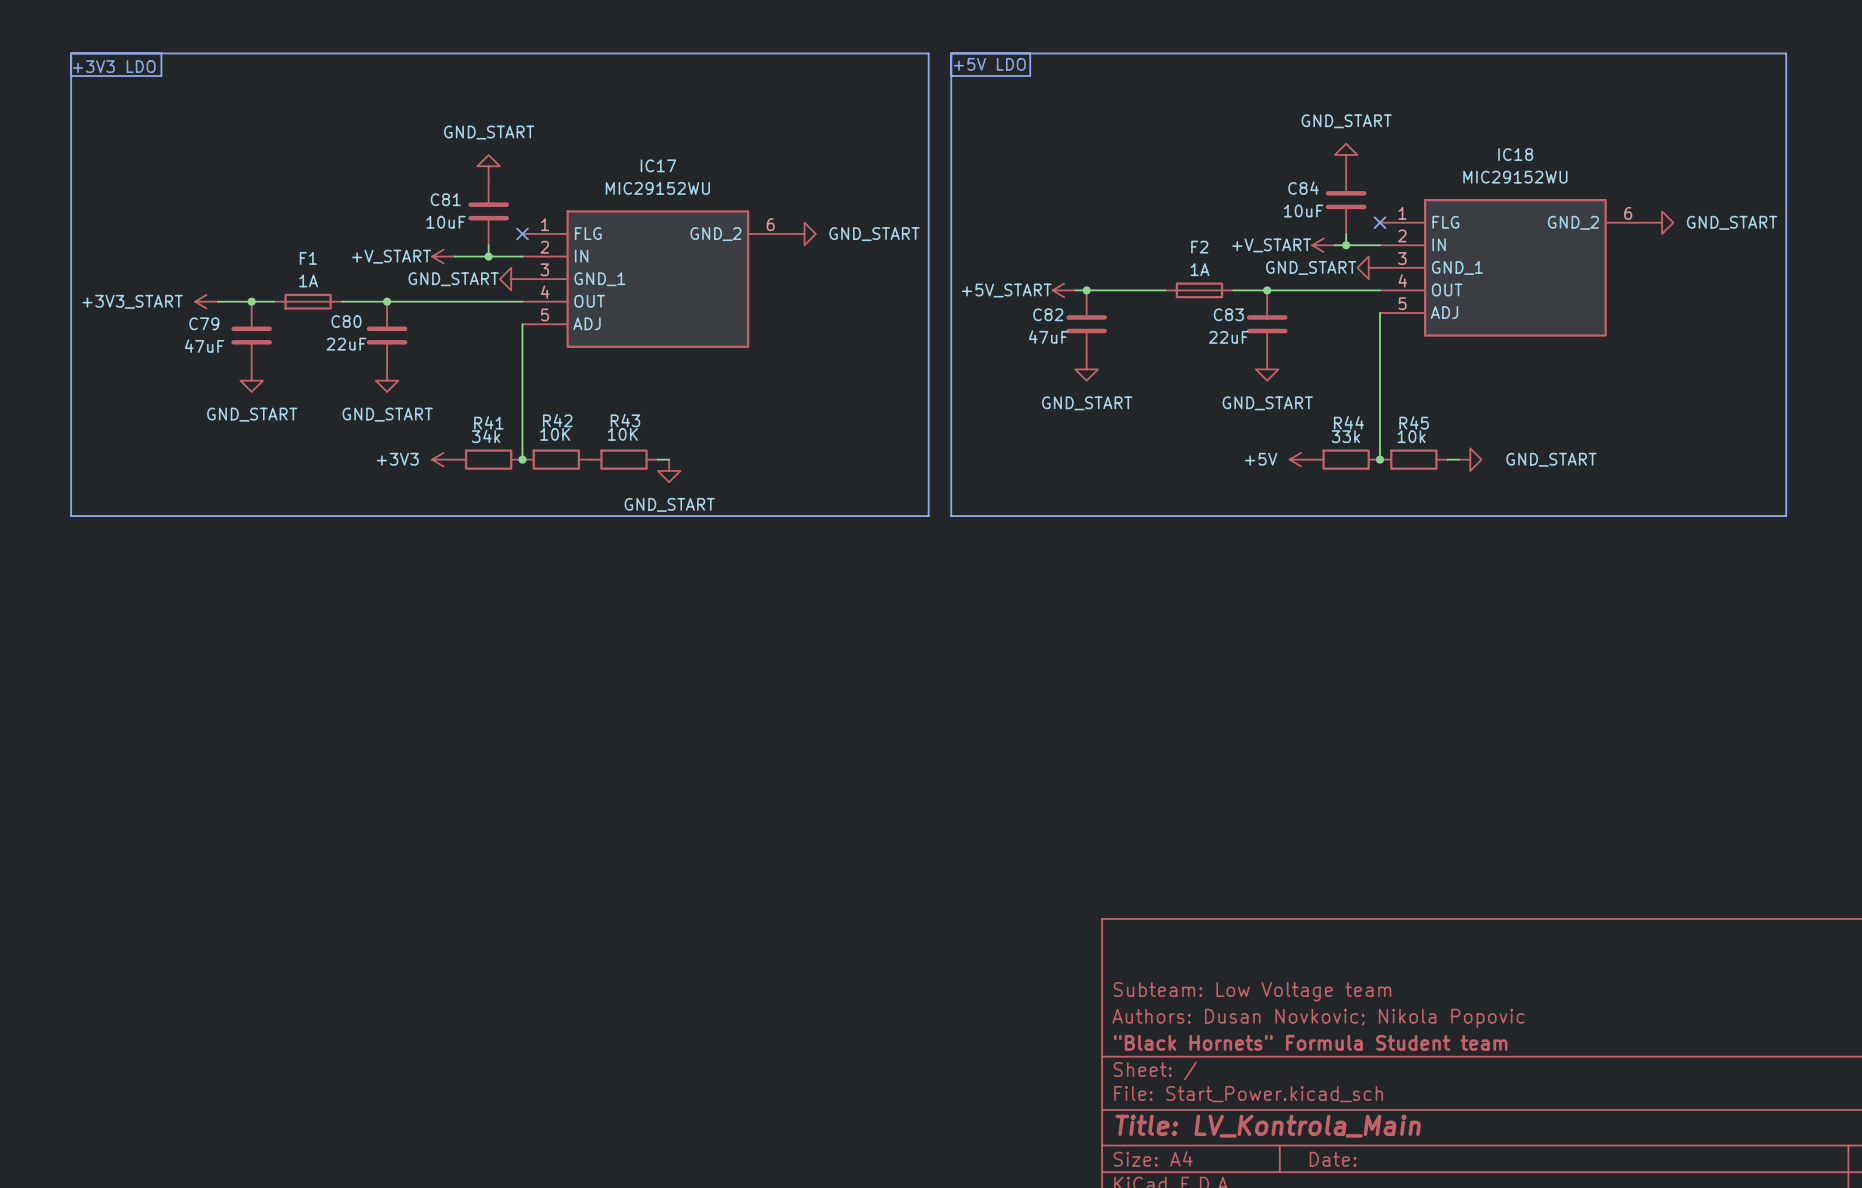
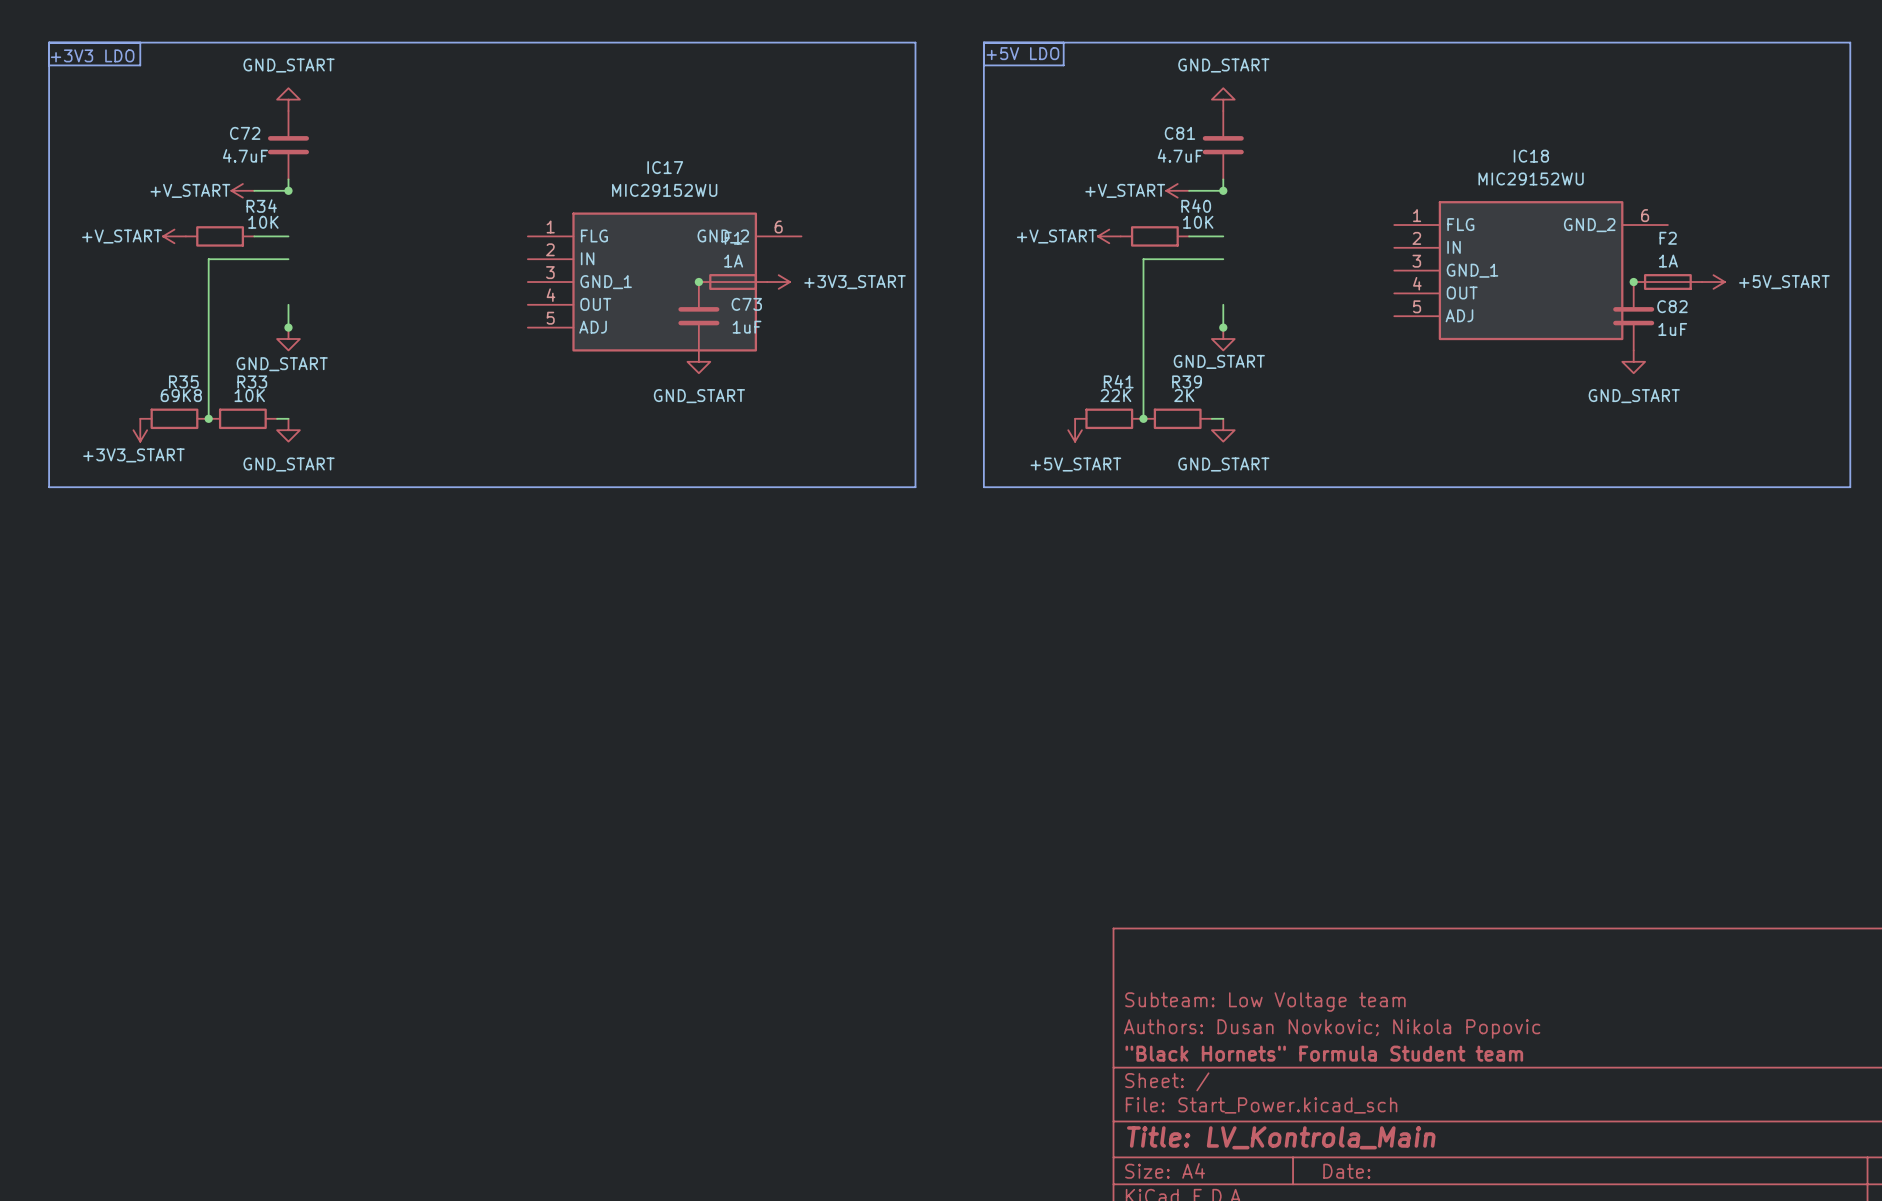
line: (71, 53) (928, 53) (928, 516) (71, 516) (71, 53) -> (49, 42) (49, 487) (915, 487) (915, 42) (49, 42)
line: (161, 53) (161, 76) (71, 76) -> (140, 42) (140, 65) (49, 65)
line: (951, 53) (1786, 53) (1786, 516) (951, 516) (951, 53) -> (983, 42) (983, 487) (1850, 487) (1850, 42) (983, 42)
line: (1030, 53) (1030, 76) (951, 76) -> (1063, 42) (1063, 65) (983, 65)
text position: +5V LDO (989, 64) -> +5V LDO (1022, 53)
text position: +3V3 LDO (114, 66) -> +3V3 LDO (92, 55)
power symbol: none -> GND_START (288, 99)
power symbol: none -> GND_START (1223, 99)
C72: none -> 4.7uF (288, 145)
power symbol: GND_START (1346, 155) -> none
power symbol: GND_START (488, 166) -> none
wire: none -> (288, 179) (288, 190) (254, 190)
wire: none -> (1223, 179) (1223, 190) (1189, 190)
power symbol: none -> +V_START (242, 190)
junction: none -> (288, 190)
power symbol: none -> +V_START (1177, 190)
junction: none -> (1223, 190)
C84: 10uF (1346, 200) -> none
C81 position: (488, 211) -> (1223, 145)
C81 value: 10uF (446, 222) -> 4.7uF (1180, 155)
no-connect mark: (1380, 222) -> none
power symbol: GND_START (1662, 222) -> none
power symbol: none -> +V_START (174, 236)
R34: none -> 10K (220, 236)
wire: none -> (254, 236) (288, 236)
no-connect mark: (522, 233) -> none
power symbol: GND_START (804, 233) -> none
power symbol: none -> +V_START (1109, 236)
R40: none -> 10K (1154, 236)
wire: none -> (1189, 236) (1223, 236)
wire: (1346, 233) (1346, 245) -> none
wire: (488, 245) (488, 256) -> none
power symbol: +V_START (1323, 245) -> none
wire: (1334, 245) (1380, 245) -> none
junction: (1346, 245) -> none
wire: none -> (288, 259) (208, 259) (208, 418)
power symbol: +V_START (443, 256) -> none
wire: (454, 256) (522, 256) -> none
junction: (488, 256) -> none
wire: none -> (1223, 259) (1143, 259) (1143, 418)
power symbol: GND_START (1368, 267) -> none
power symbol: GND_START (511, 279) -> none
junction: none -> (698, 282)
power symbol: none -> +3V3_START (778, 282)
junction: none -> (1633, 282)
power symbol: none -> +5V_START (1713, 282)
power symbol text position: +5V_START (1006, 290) -> +5V_START (1075, 464)
power symbol rotation: 0° (1064, 290) -> 90° counterclockwise (1075, 430)
power symbol position: +5V_START (1064, 290) -> +5V_START (1075, 430)
wire: (1075, 290) (1165, 290) -> none
junction: (1086, 290) -> none
F2 position: (1199, 290) -> (1667, 282)
wire: (1233, 290) (1380, 290) -> none
junction: (1267, 290) -> none
power symbol text position: +3V3_START (132, 301) -> +3V3_START (133, 455)
power symbol rotation: 0° (206, 301) -> 90° counterclockwise (140, 430)
power symbol position: +3V3_START (206, 301) -> +3V3_START (140, 430)
wire: (217, 301) (274, 301) -> none
junction position: (251, 301) -> (288, 327)
wire: none -> (288, 304) (288, 327)
F1 position: (308, 301) -> (733, 282)
wire: (341, 301) (522, 301) -> none
junction: (387, 301) -> none
wire: none -> (1223, 304) (1223, 327)
C73: none -> 1uF (698, 316)
wire: (1380, 312) (1380, 459) -> none
C82 name position: C82 (1048, 314) -> C82 (1672, 306)
wire: (522, 324) (522, 459) -> none
C82 position: (1086, 324) -> (1633, 316)
junction: none -> (1223, 327)
C83: 22uF (1267, 324) -> none
C79: 47uF (251, 335) -> none
power symbol: none -> GND_START (288, 339)
C80: 22uF (387, 335) -> none
power symbol: none -> GND_START (1223, 339)
C82 value: 47uF (1048, 337) -> 1uF (1672, 329)
power symbol: none -> GND_START (698, 361)
power symbol: none -> GND_START (1633, 361)
power symbol: GND_START (1086, 369) -> none
power symbol: GND_START (1267, 369) -> none
power symbol: GND_START (251, 380) -> none
power symbol: GND_START (387, 380) -> none
R33: none -> 10K (174, 418)
junction: none -> (208, 418)
R35: none -> 69K8 (242, 418)
R39: none -> 2K (1109, 418)
junction: none -> (1143, 418)
wire: none -> (1211, 418) (1223, 418)
R41 name position: R41 (488, 422) -> R41 (1118, 381)
power symbol: none -> GND_START (288, 430)
power symbol: none -> GND_START (1223, 430)
R41 value: 34k (486, 436) -> 22K (1115, 395)
power symbol: +3V3 (443, 459) -> none
R41 position: (488, 459) -> (1177, 418)
junction: (522, 459) -> none
R42: 10K (556, 459) -> none
R43: 10K (624, 459) -> none
wire: (657, 459) (669, 459) -> none
power symbol: +5V (1301, 459) -> none
R44: 33k (1346, 459) -> none
junction: (1380, 459) -> none
R45: 10k (1413, 459) -> none
wire: (1447, 459) (1458, 459) -> none
power symbol: GND_START (1470, 459) -> none
power symbol: GND_START (669, 470) -> none

